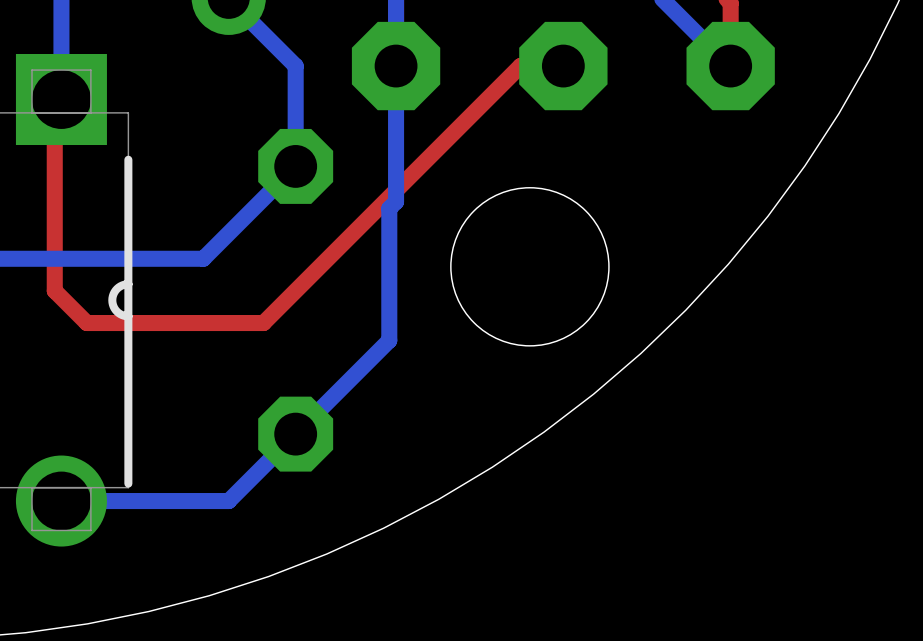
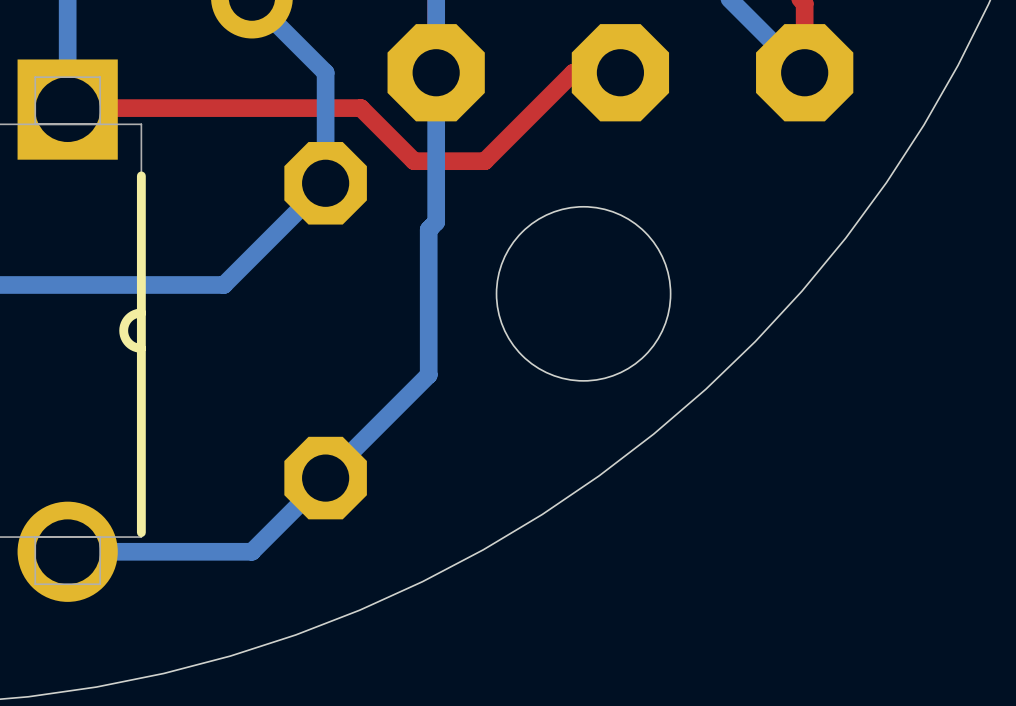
top track: (61, 99) (54, 106) (54, 290) (86, 323) (263, 323) (440, 146) -> (67, 109) (361, 108) (414, 161) (484, 161)

